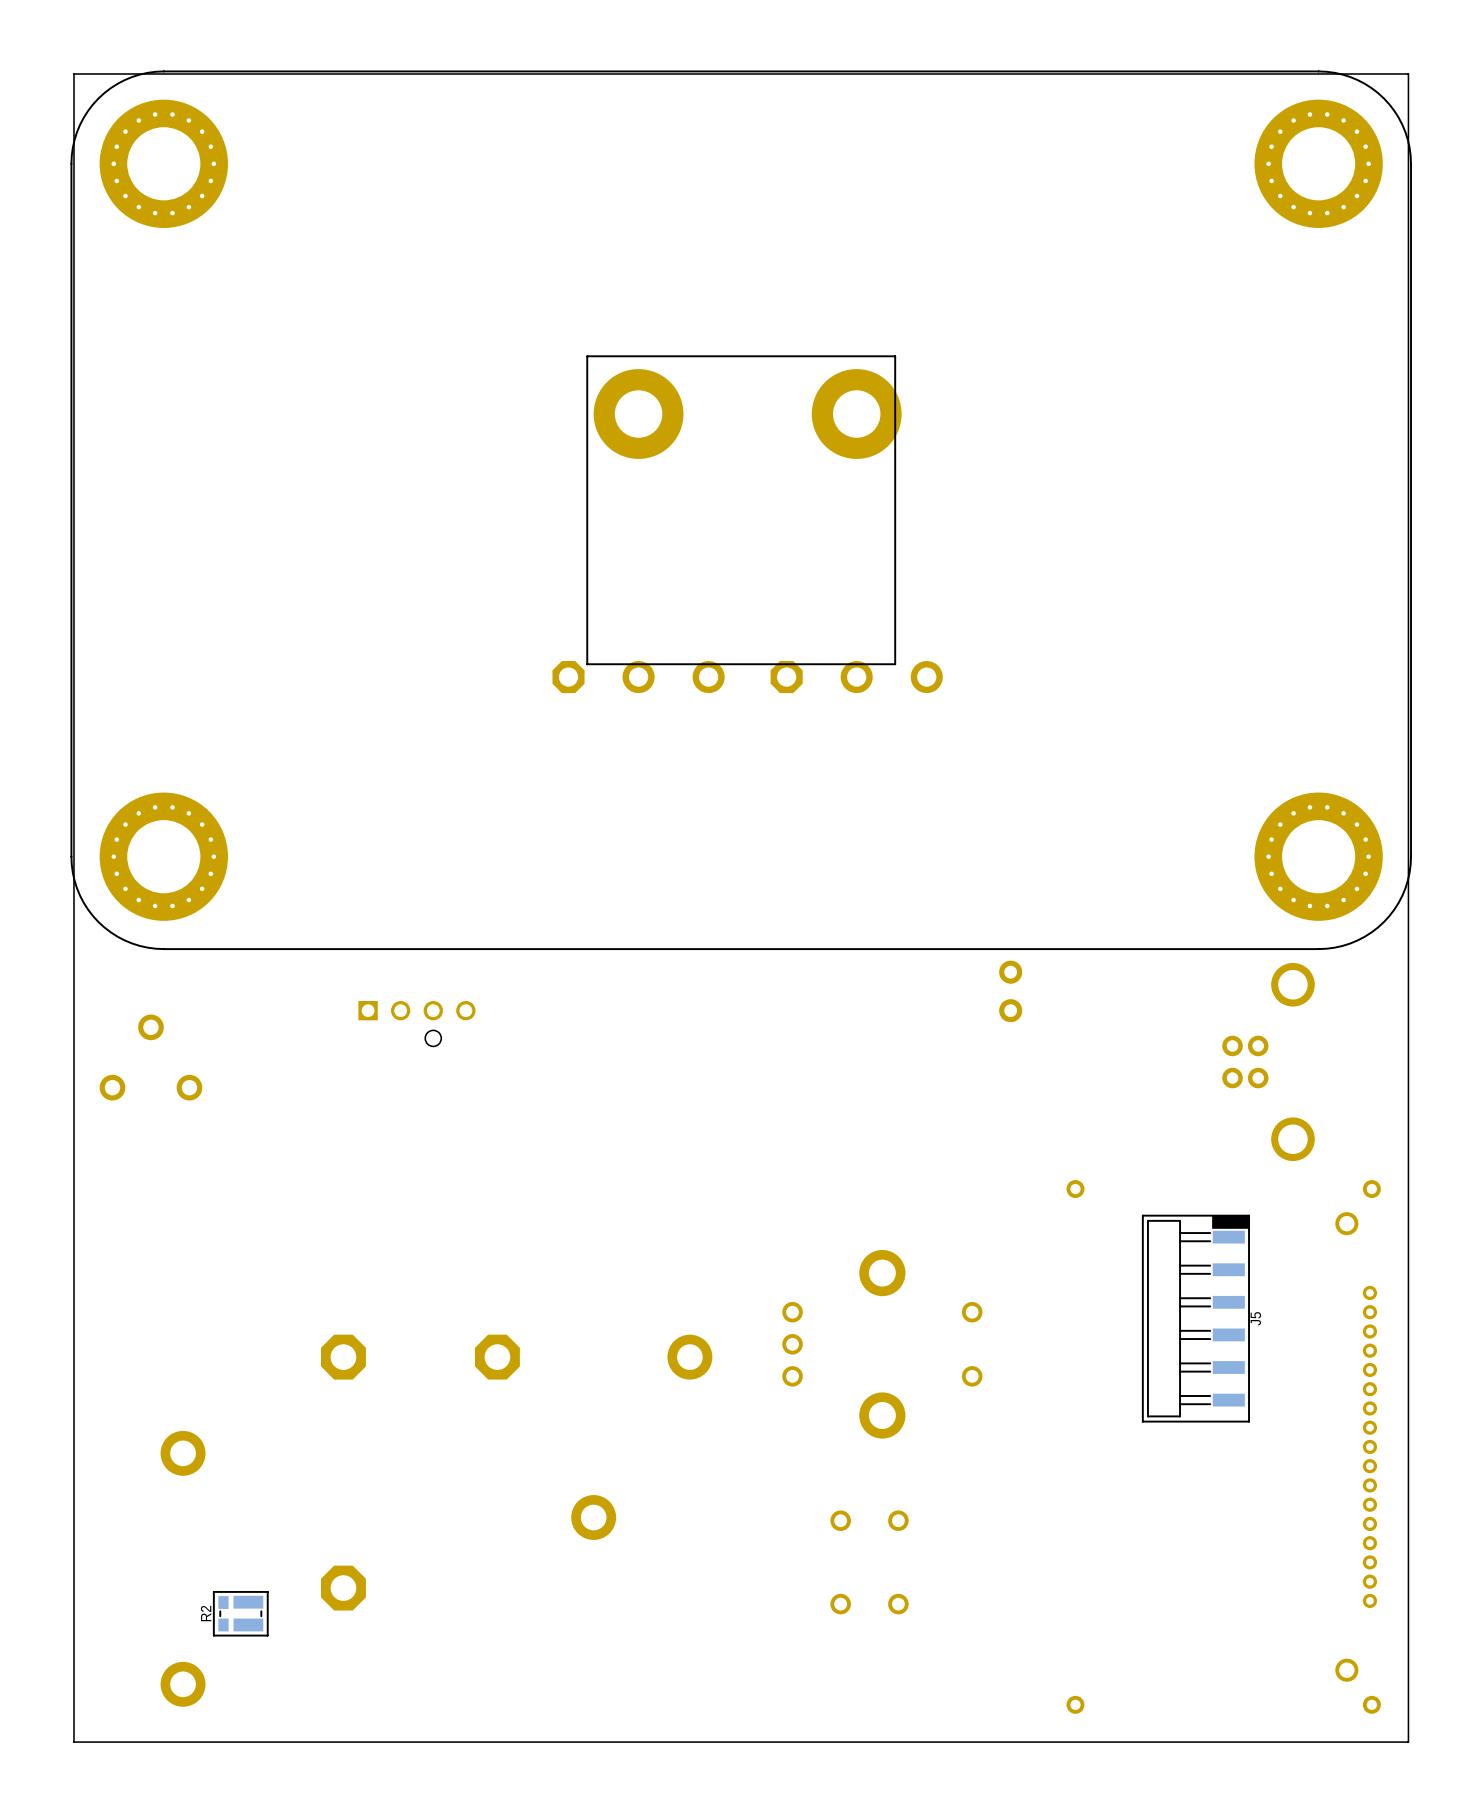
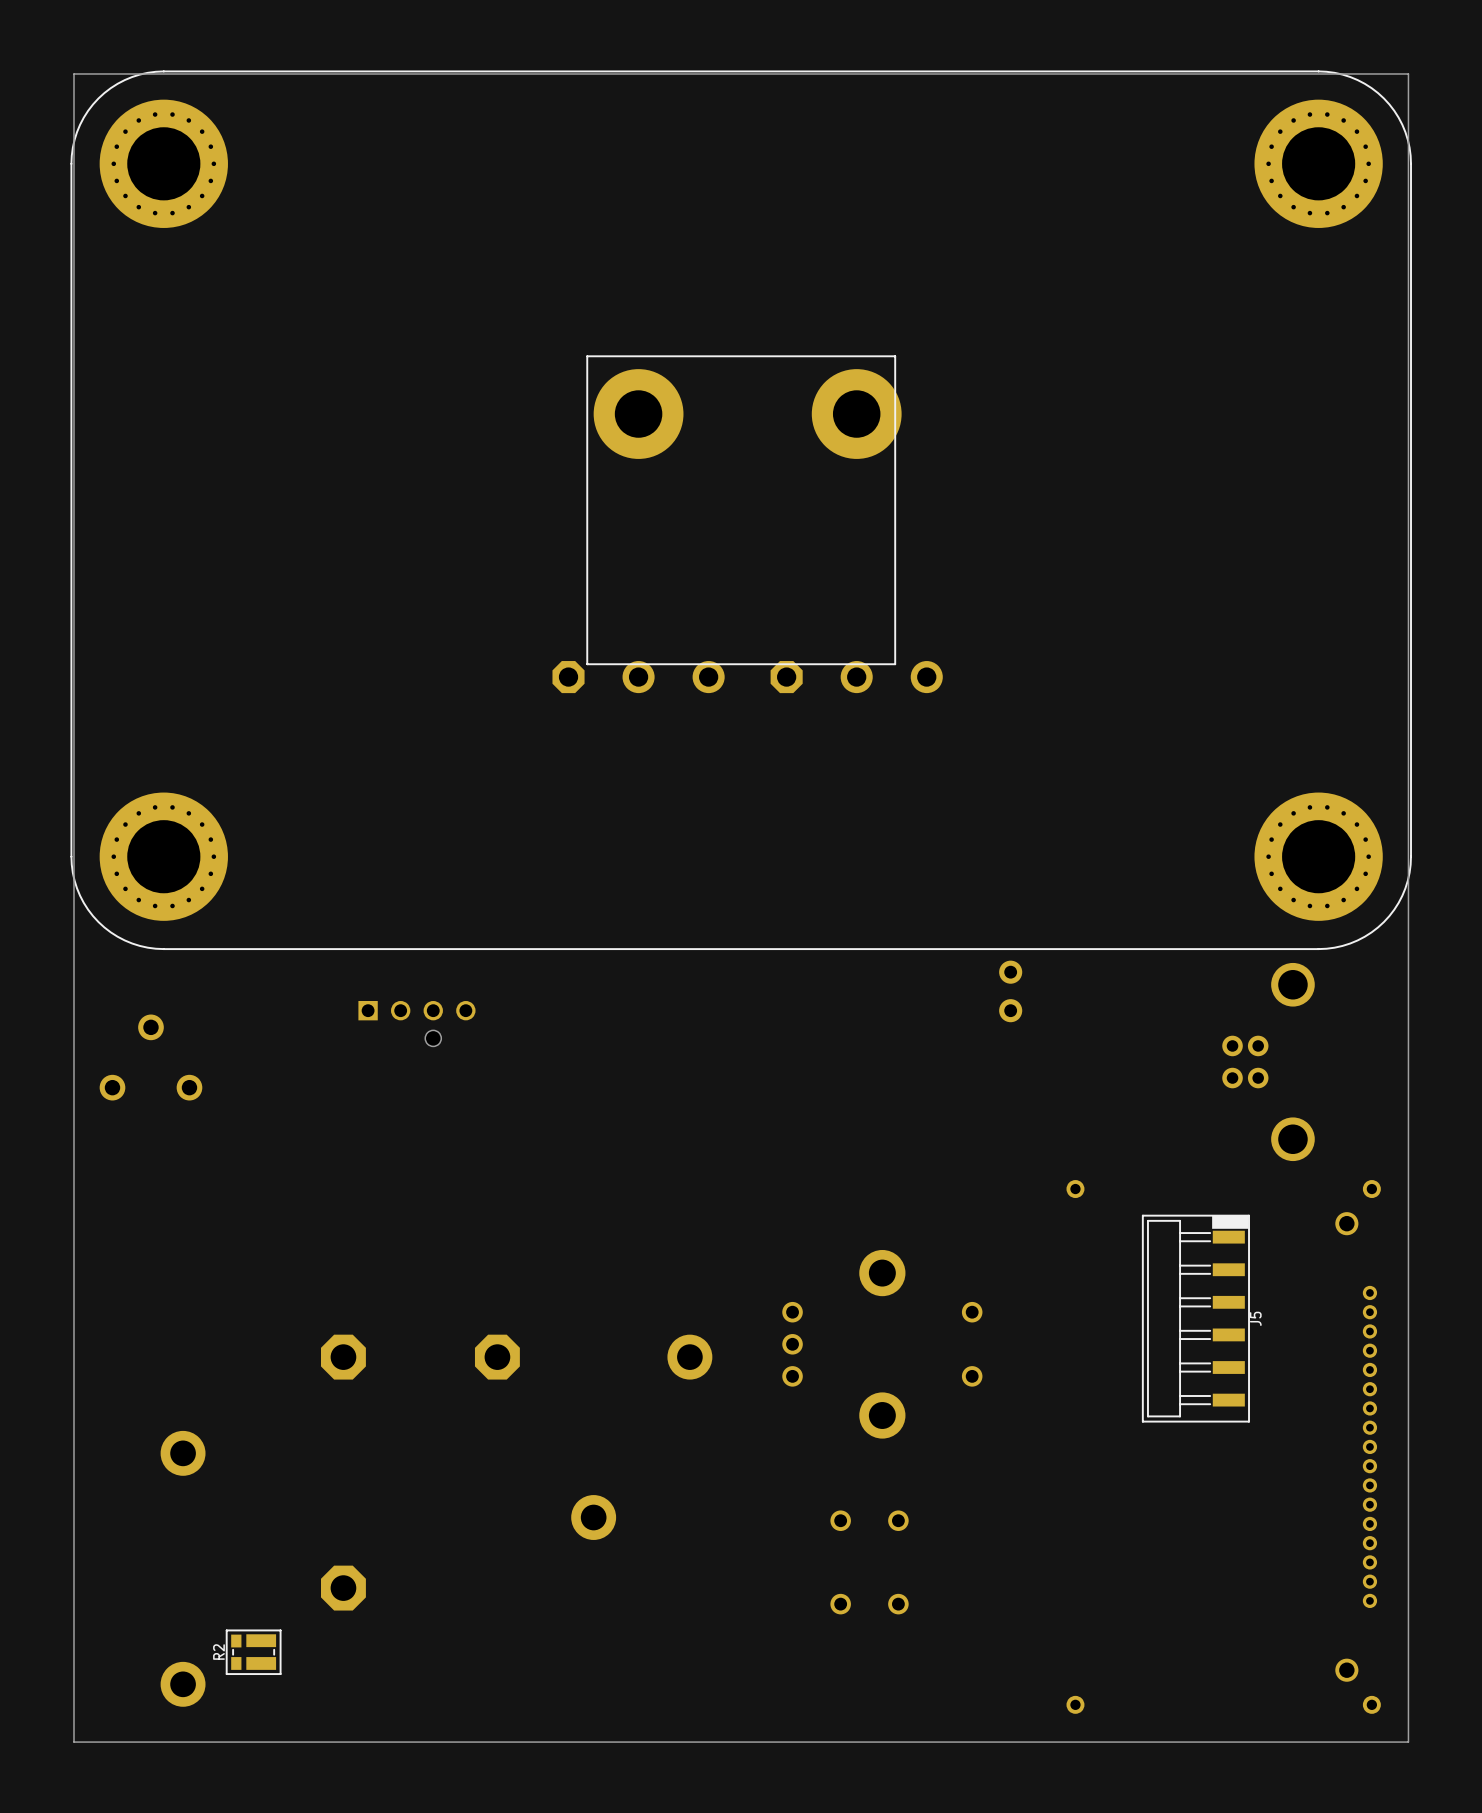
R2 position: (240, 1613) -> (253, 1652)

